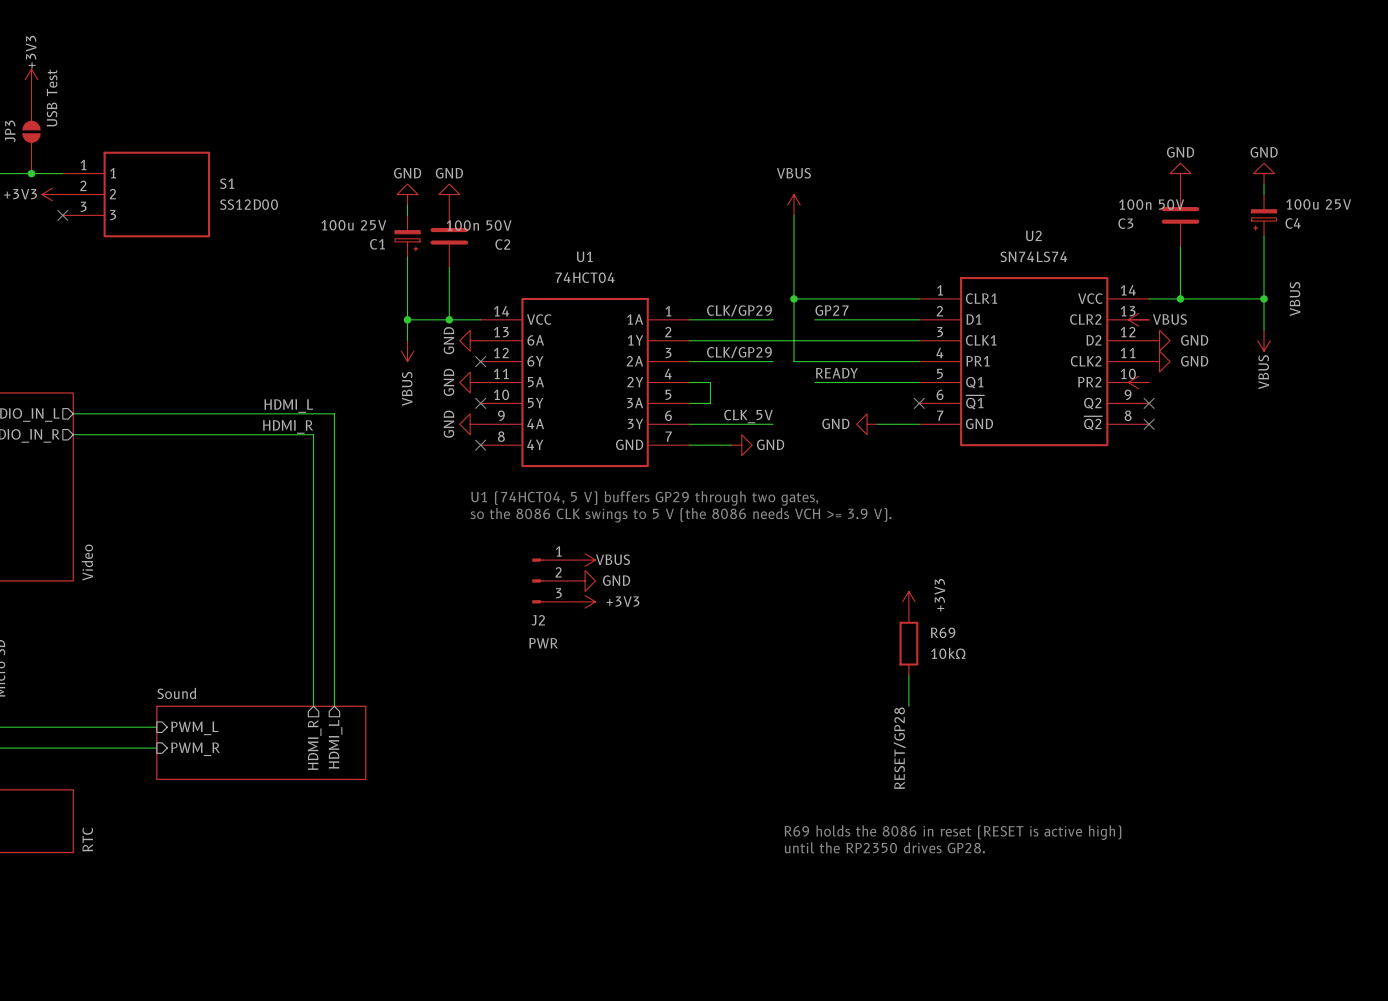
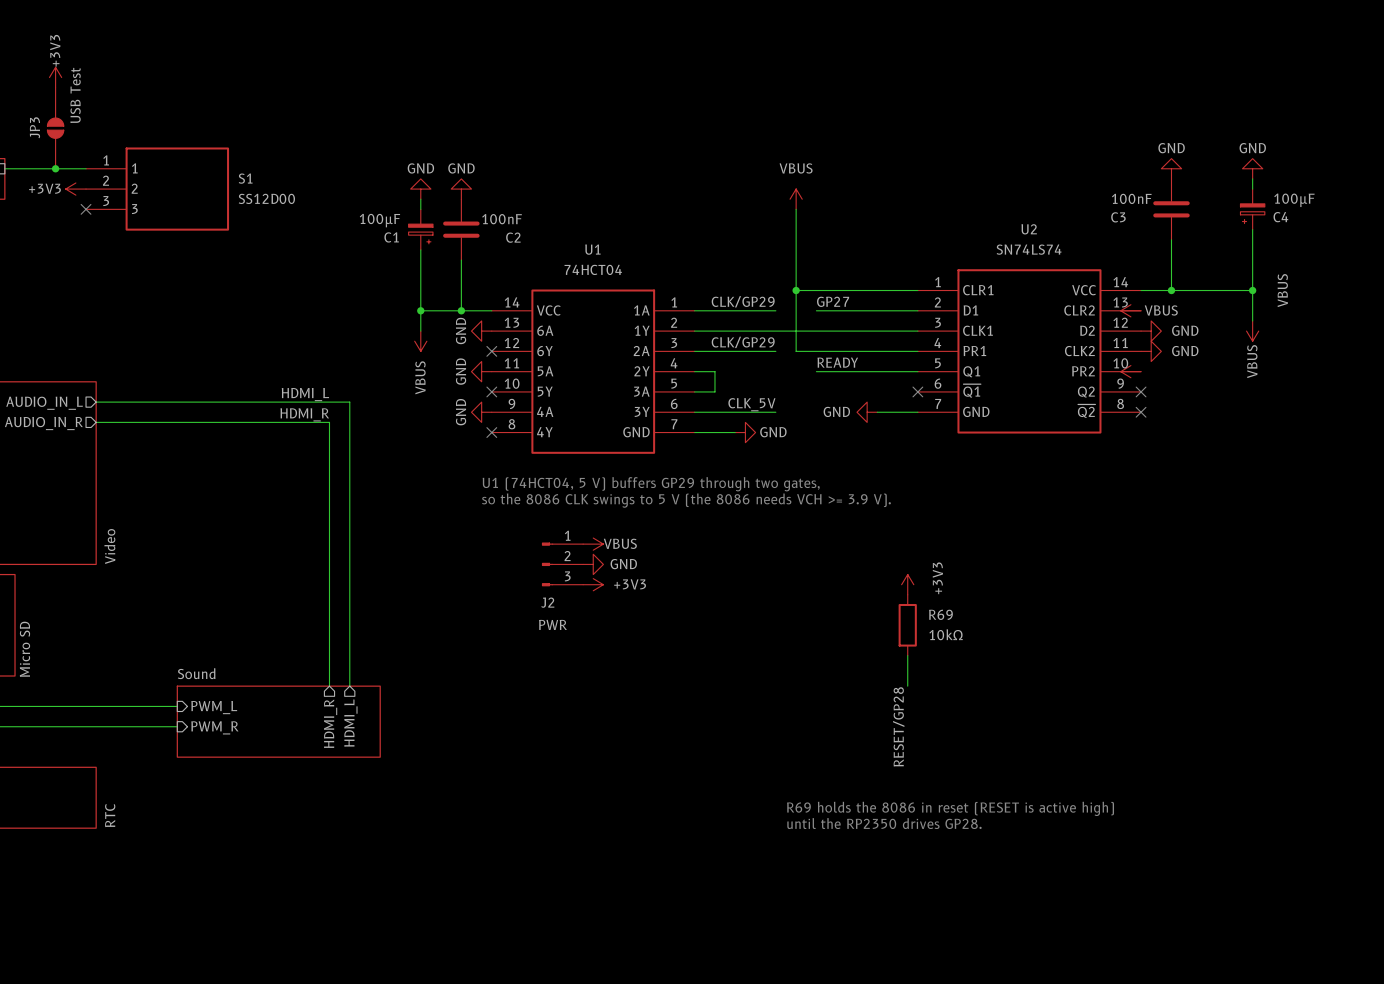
C3 value: 100n 50V (1151, 204) -> 100nF (1131, 198)
C4 value: 100u 25V (1318, 204) -> 100µF (1294, 200)
C1 value: 100u 25V (353, 225) -> 100µF (379, 220)
C2 value: 100n 50V (479, 225) -> 100nF (502, 219)

